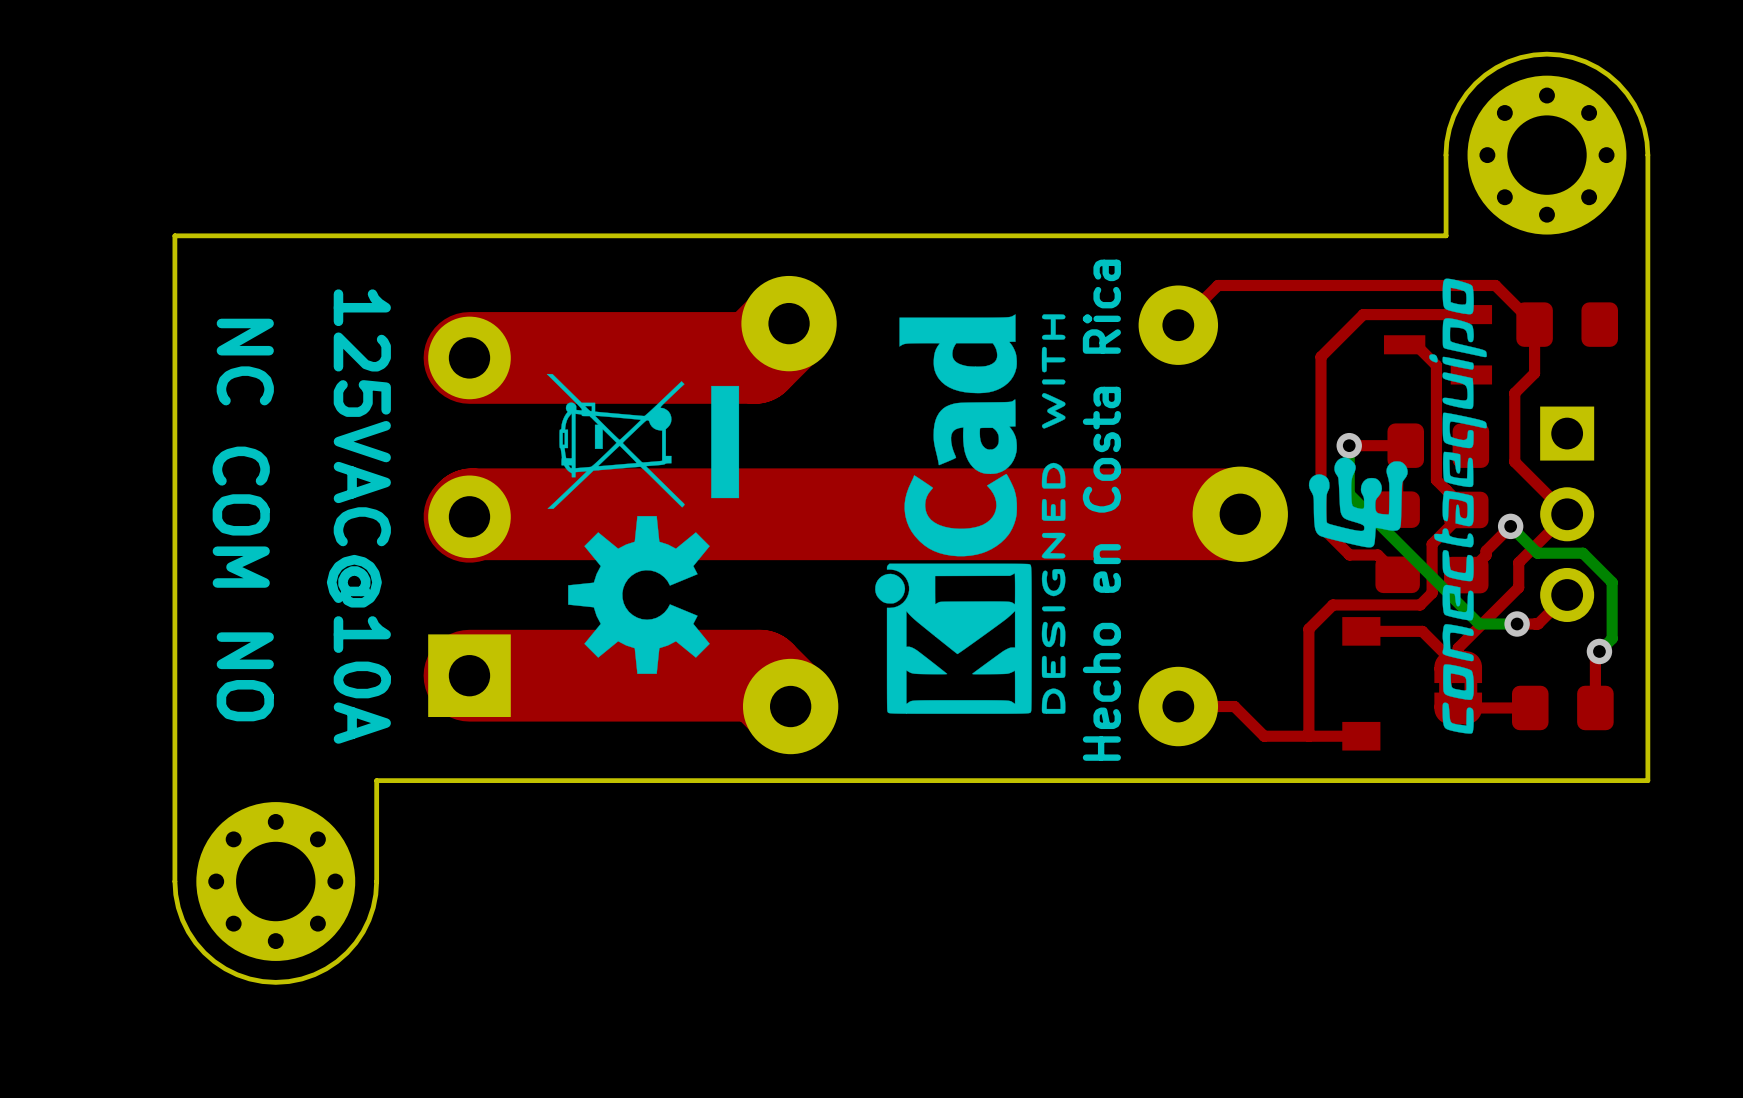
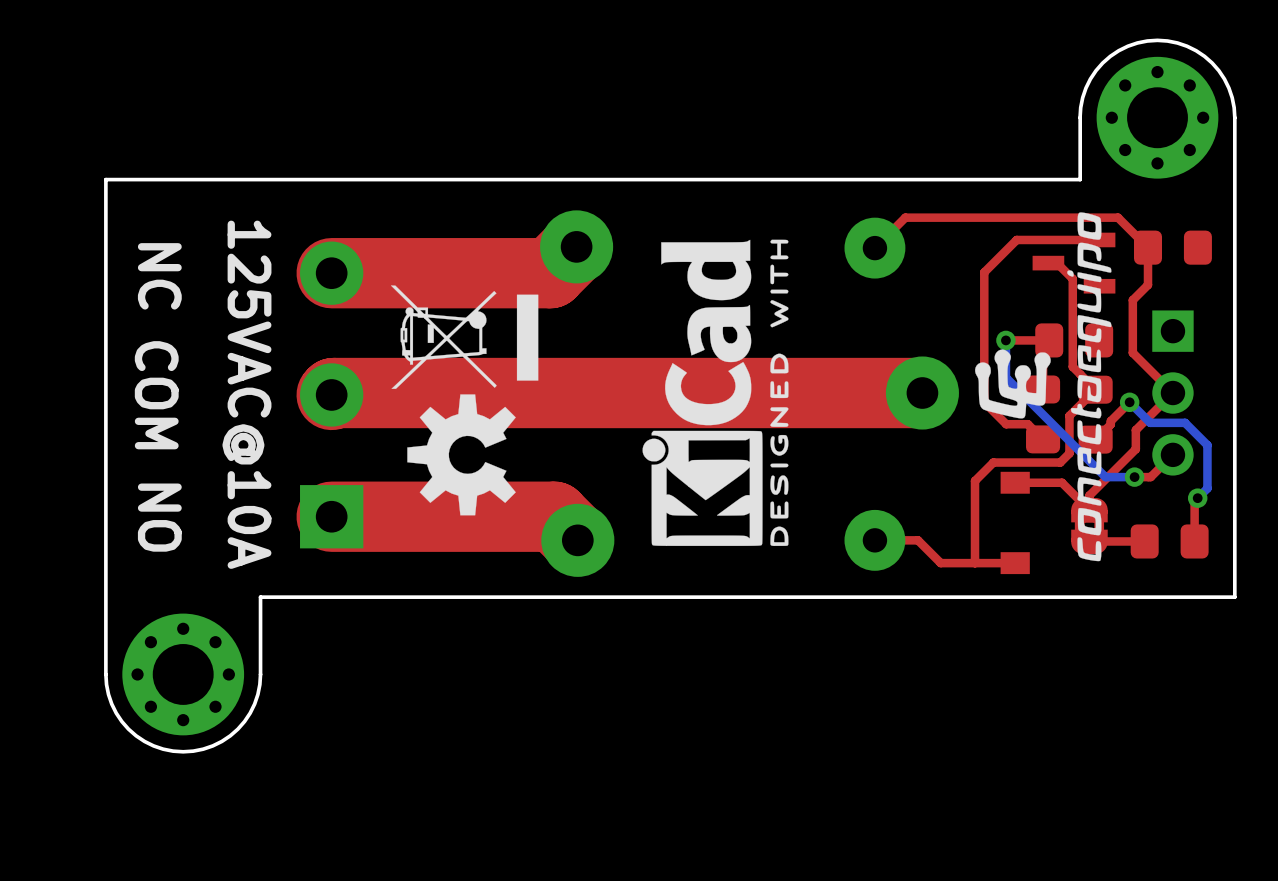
text: Hecho en Costa Rica (1101, 510) -> none

